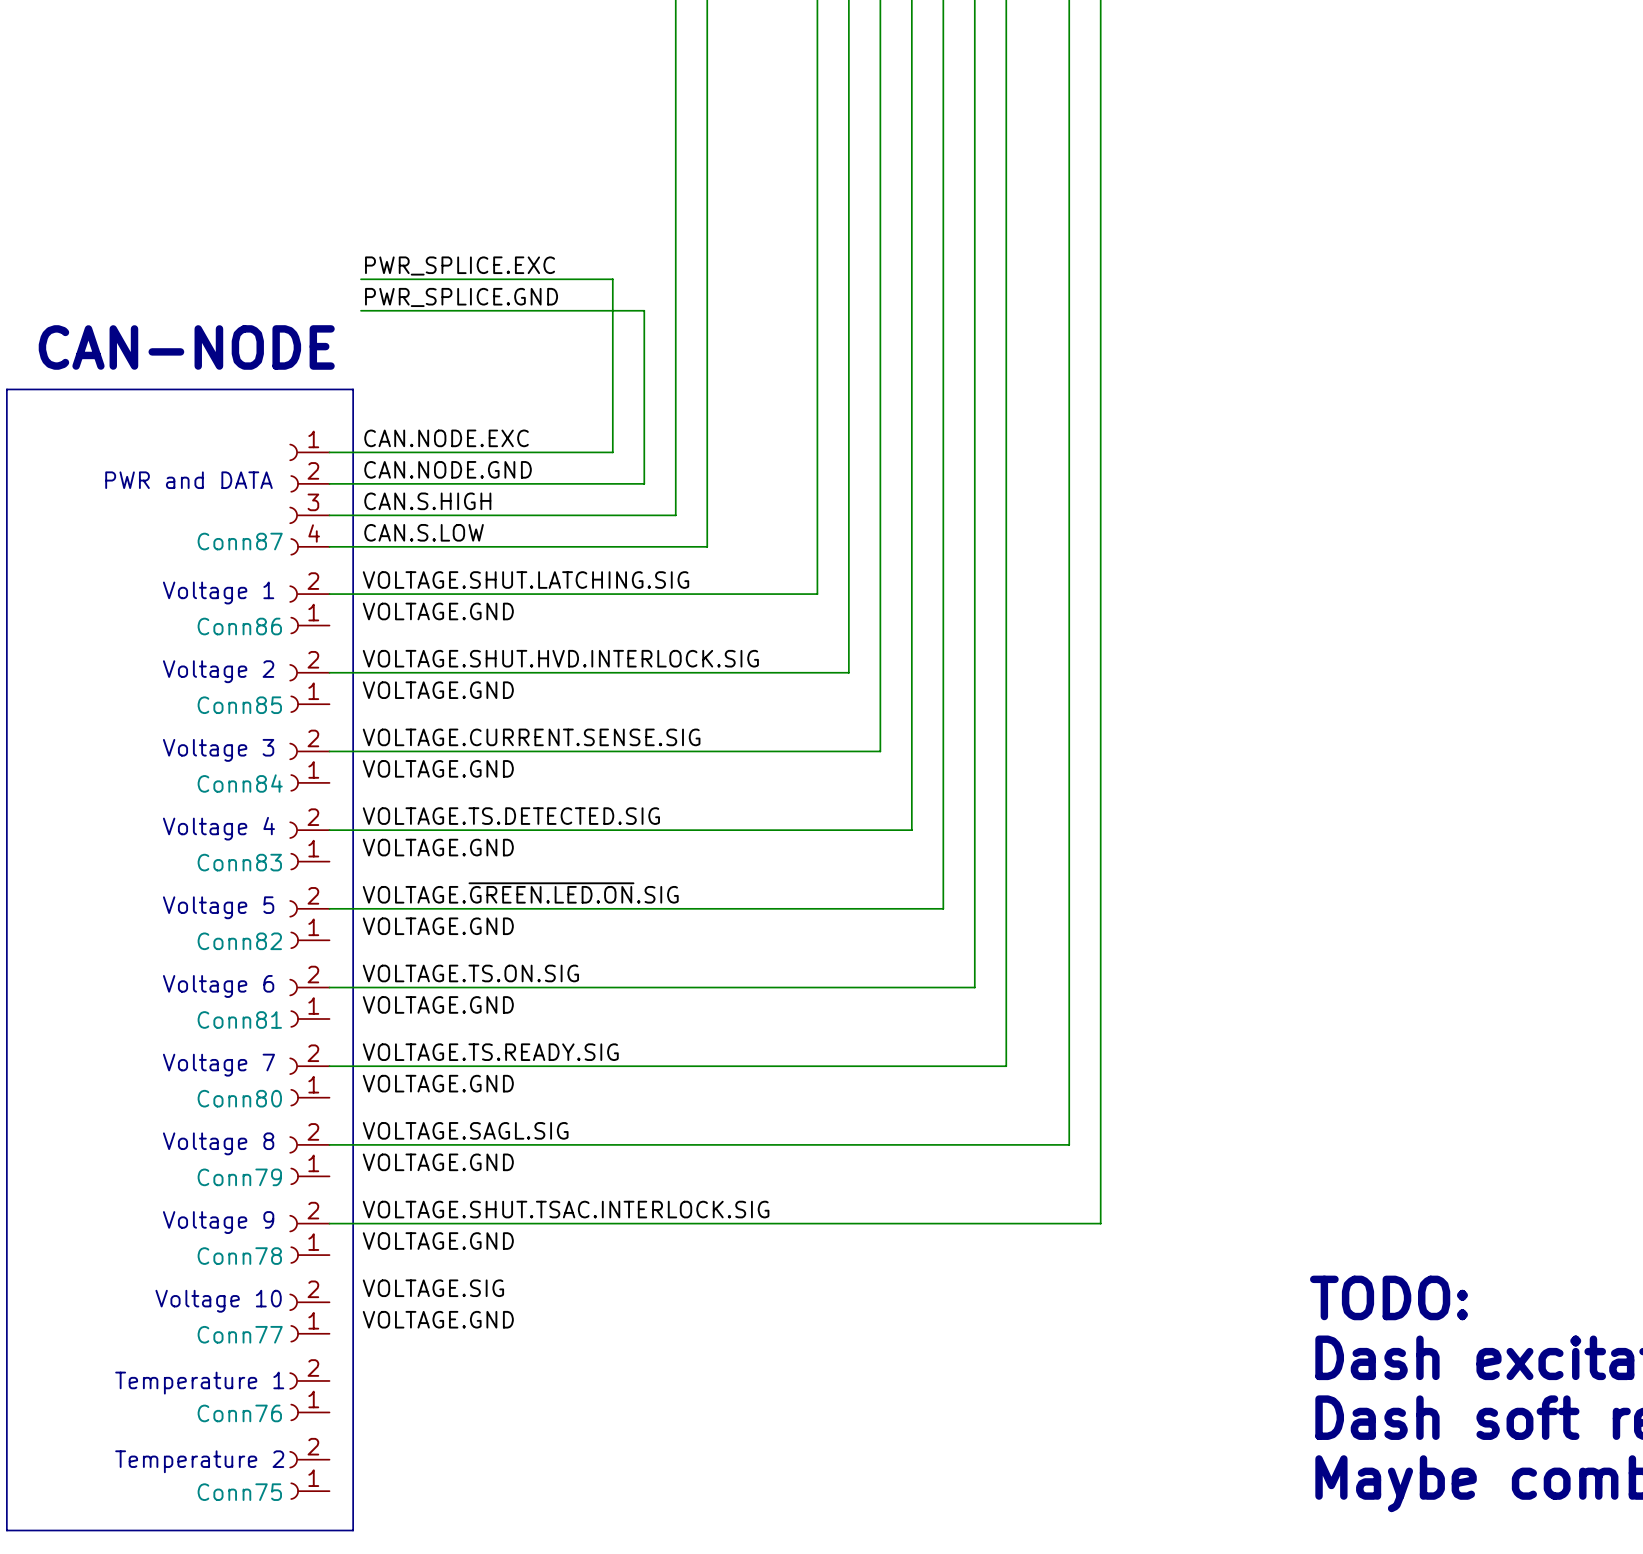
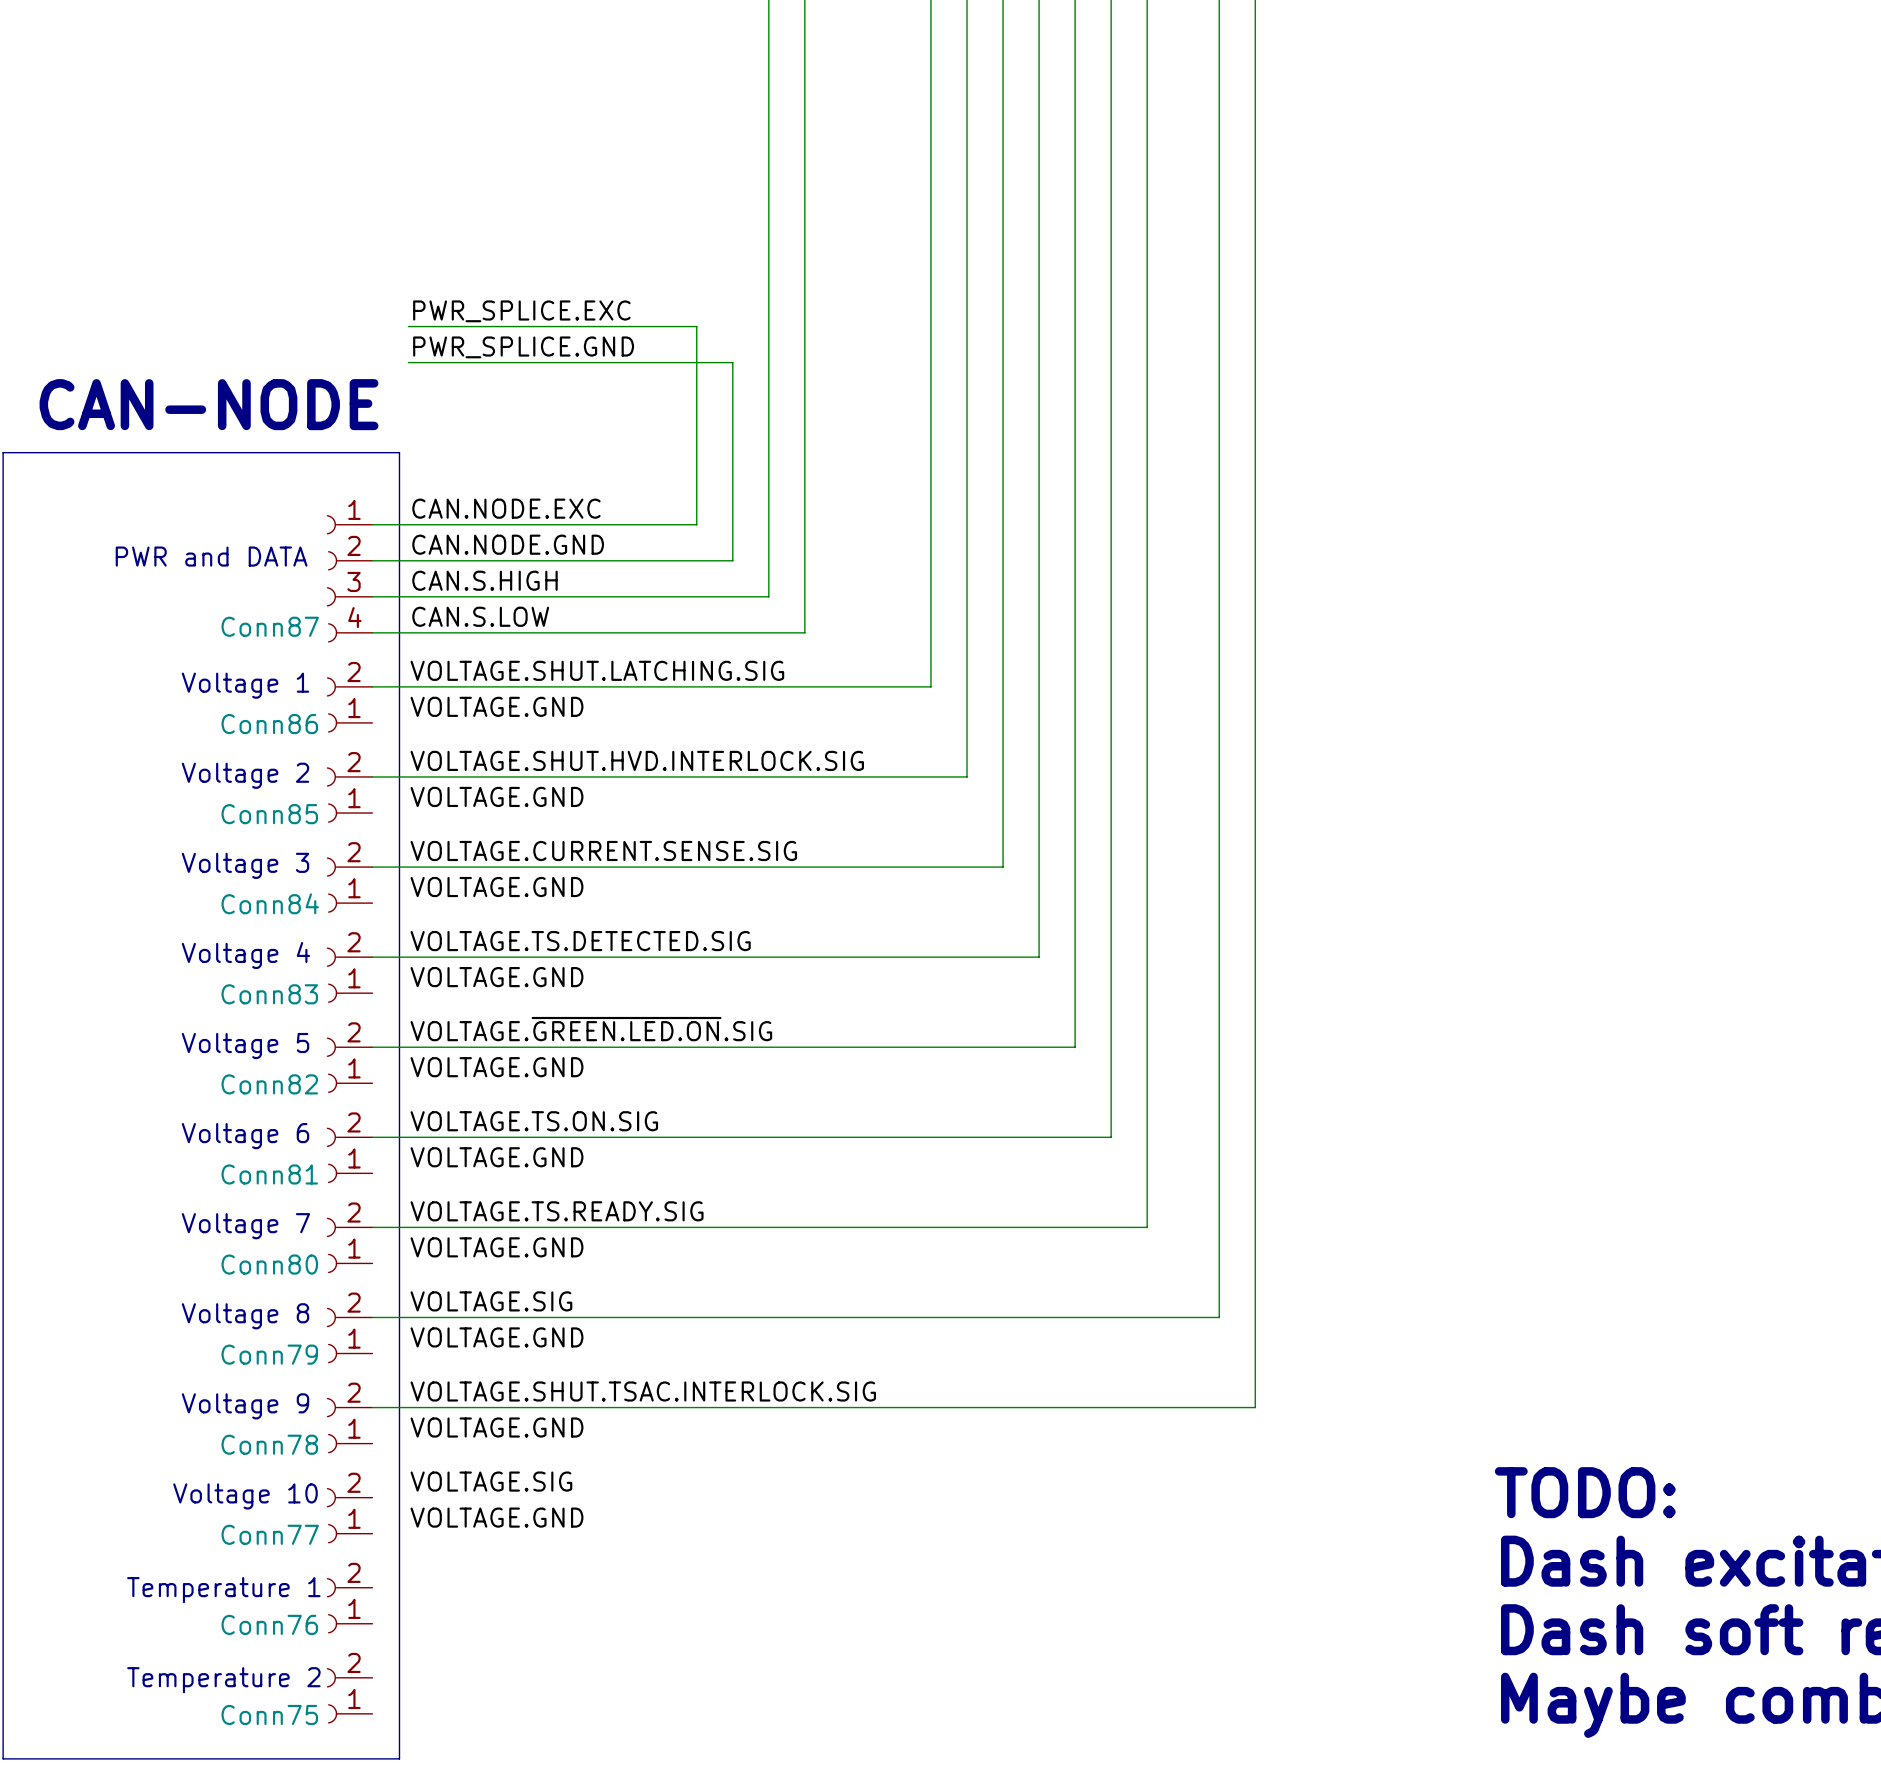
label: VOLTAGE.SAGL.SIG (465, 1130) -> VOLTAGE.SIG (491, 1301)

